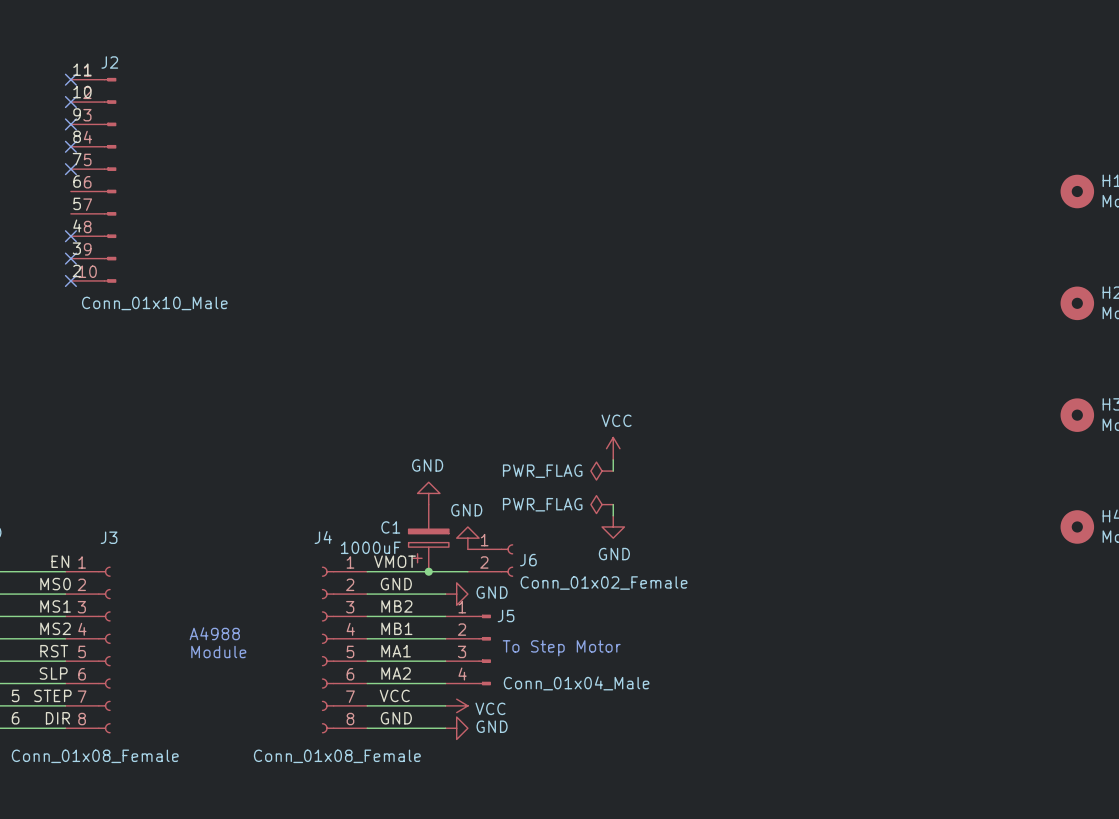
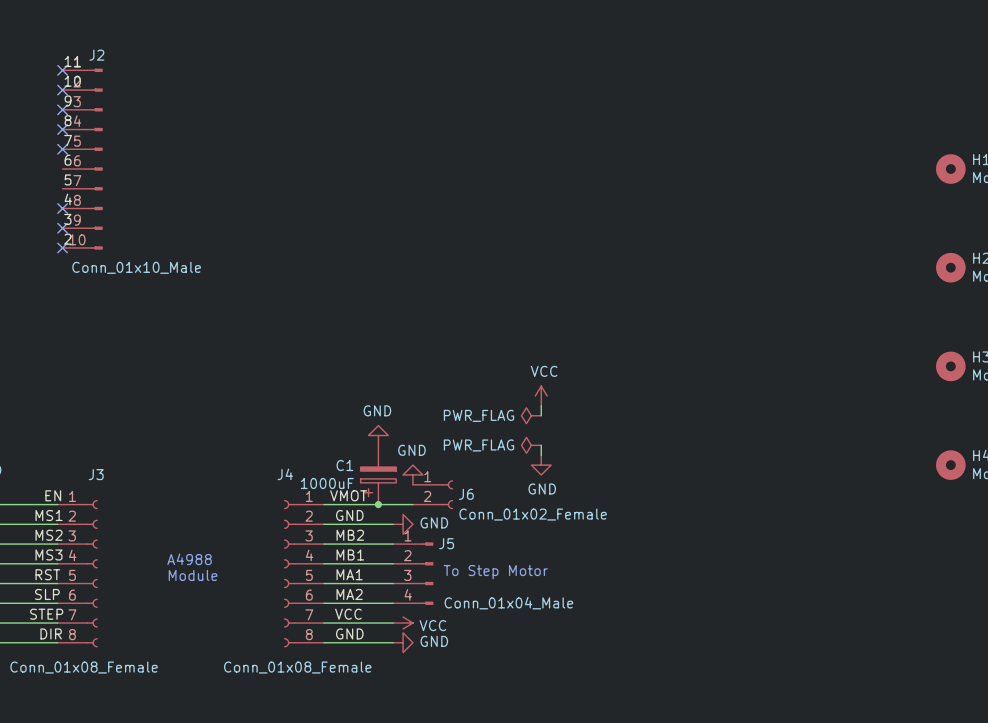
label: MS0 (55, 584) -> MS1 (49, 515)
label: MS1 (55, 606) -> MS2 (49, 535)
label: MS2 (55, 628) -> MS3 (49, 554)
label: 5 (15, 695) -> none
label: 6 (15, 718) -> none

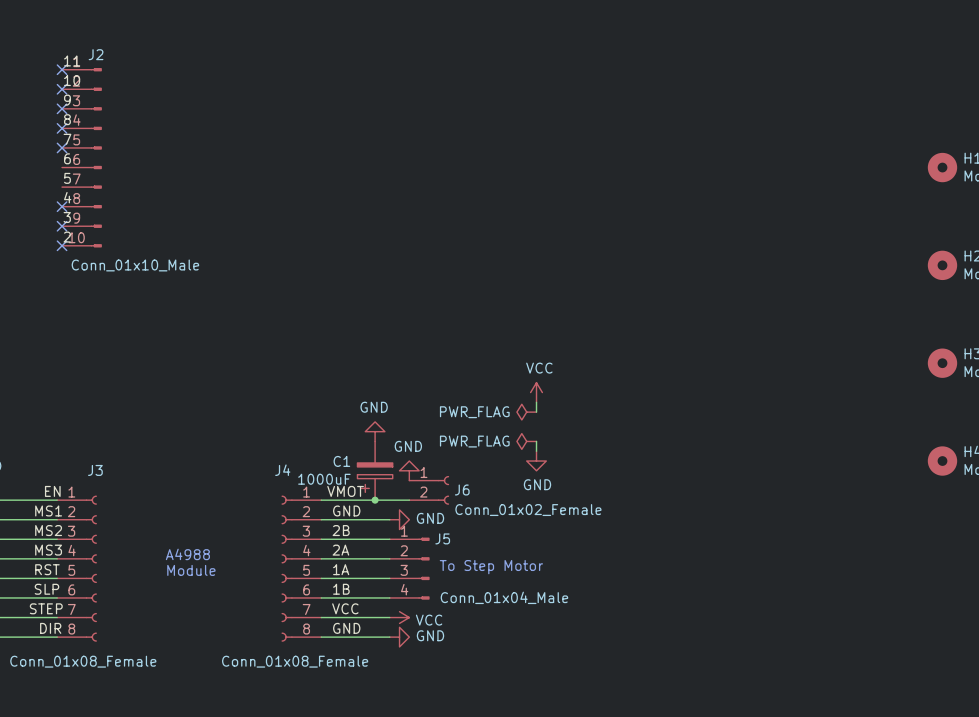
label: MB2 (350, 535) -> 2B (341, 530)
label: MB1 (350, 554) -> 2A (340, 550)
label: MA1 (349, 574) -> 1A (341, 569)
label: MA2 (349, 594) -> 1B (341, 589)

